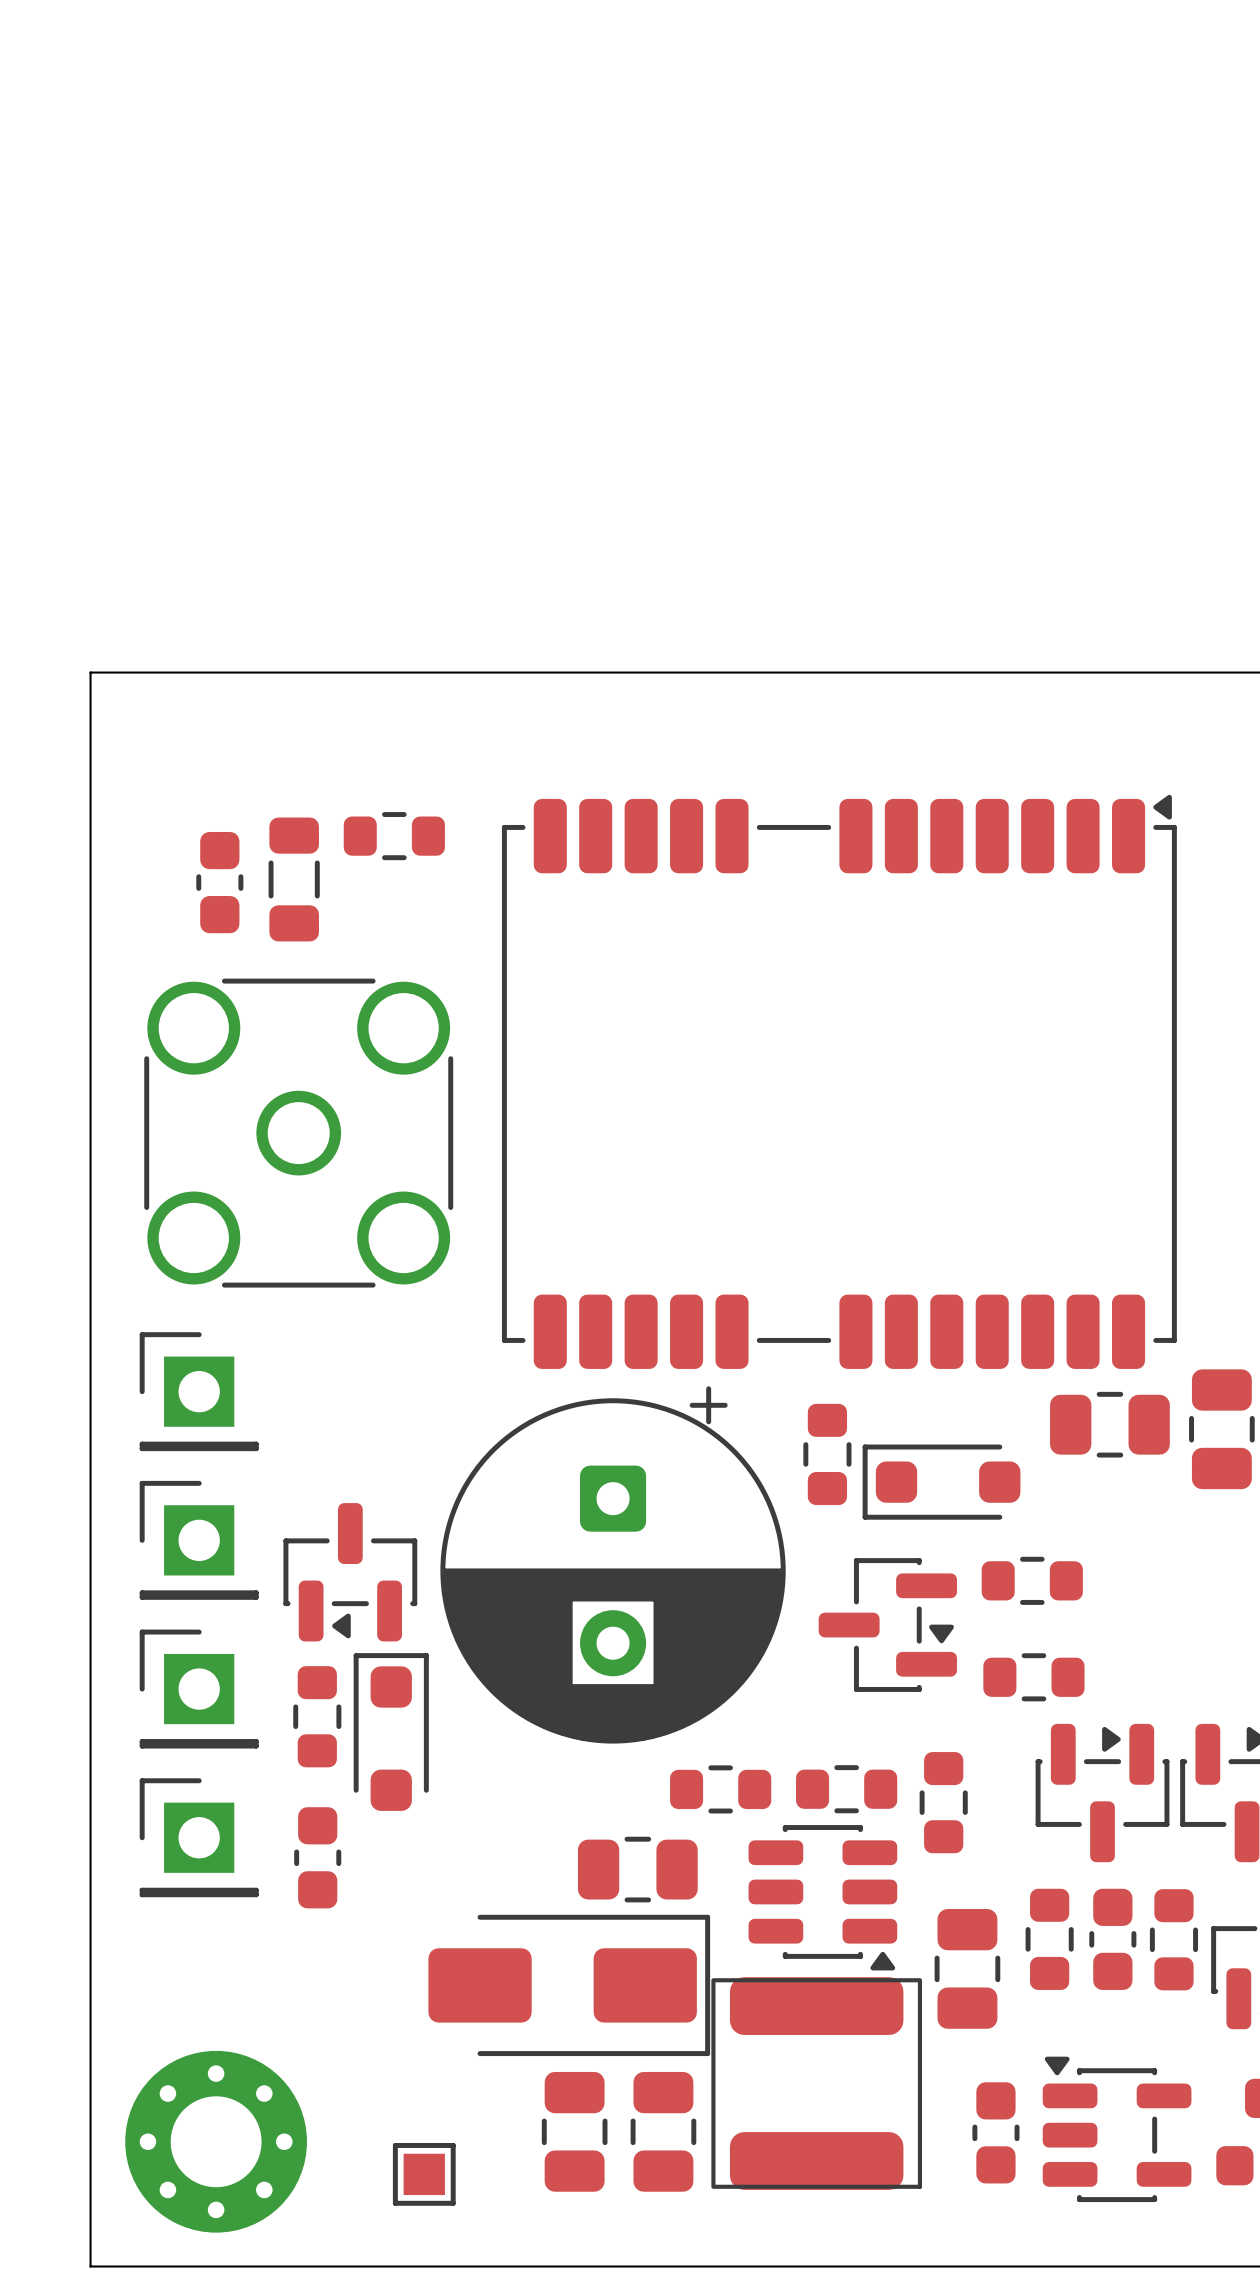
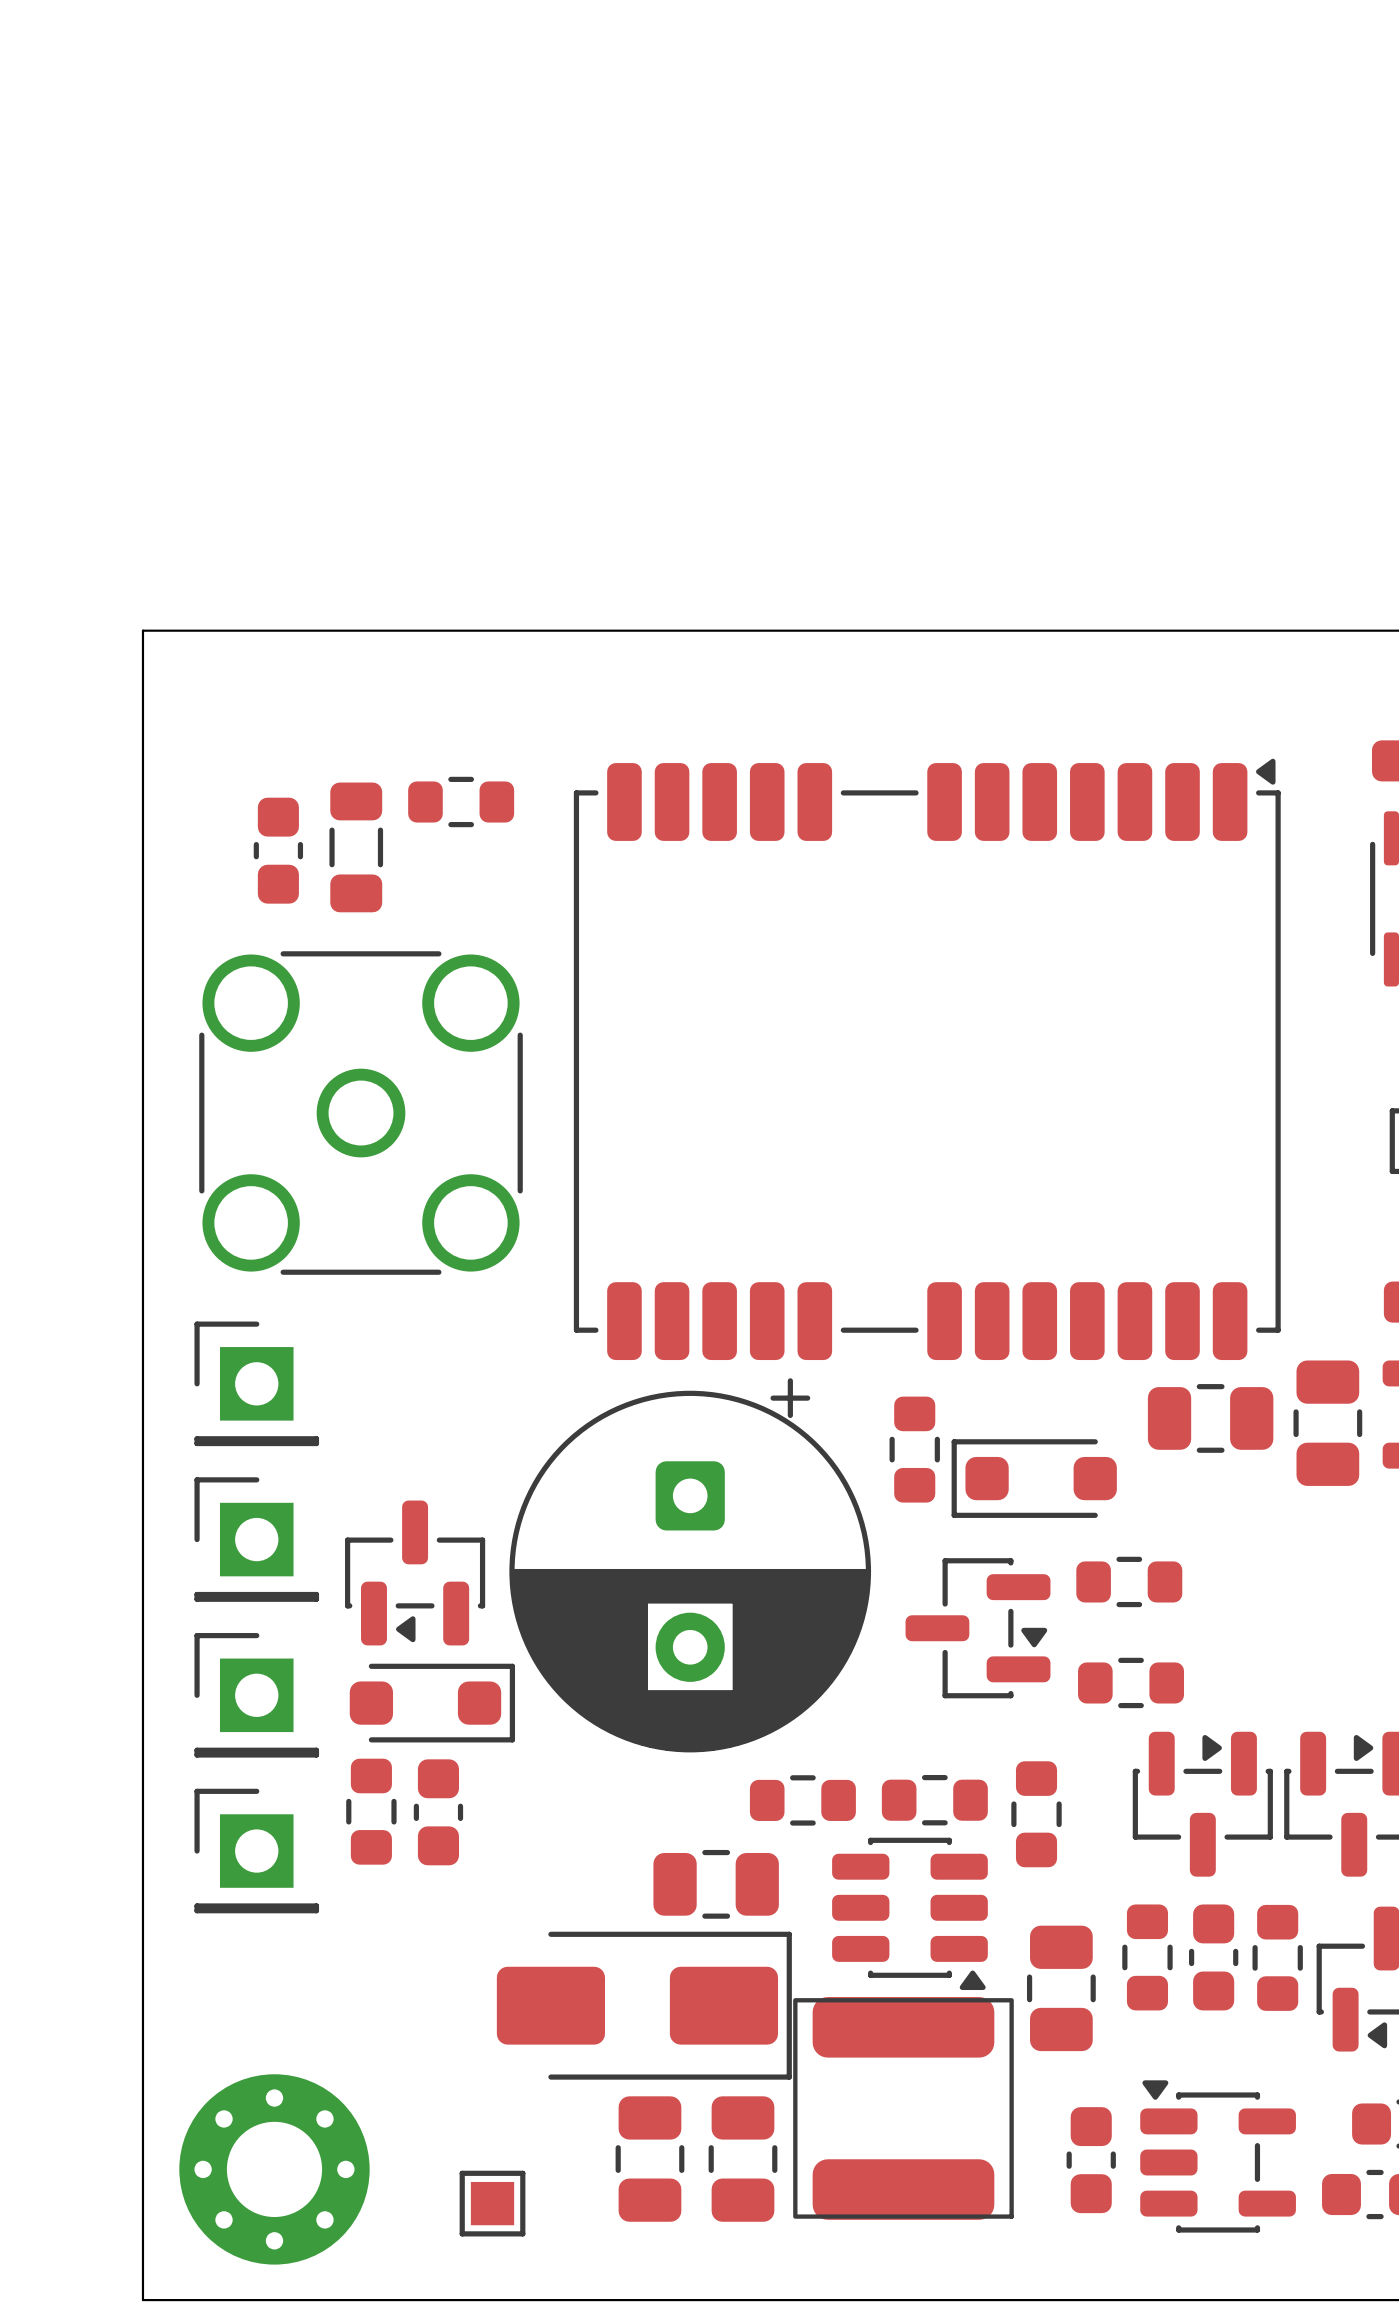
part position: (317, 1716) -> (371, 1811)
part rotation: 0° (391, 1732) -> 90° clockwise (432, 1703)
part position: (317, 1857) -> (438, 1812)

